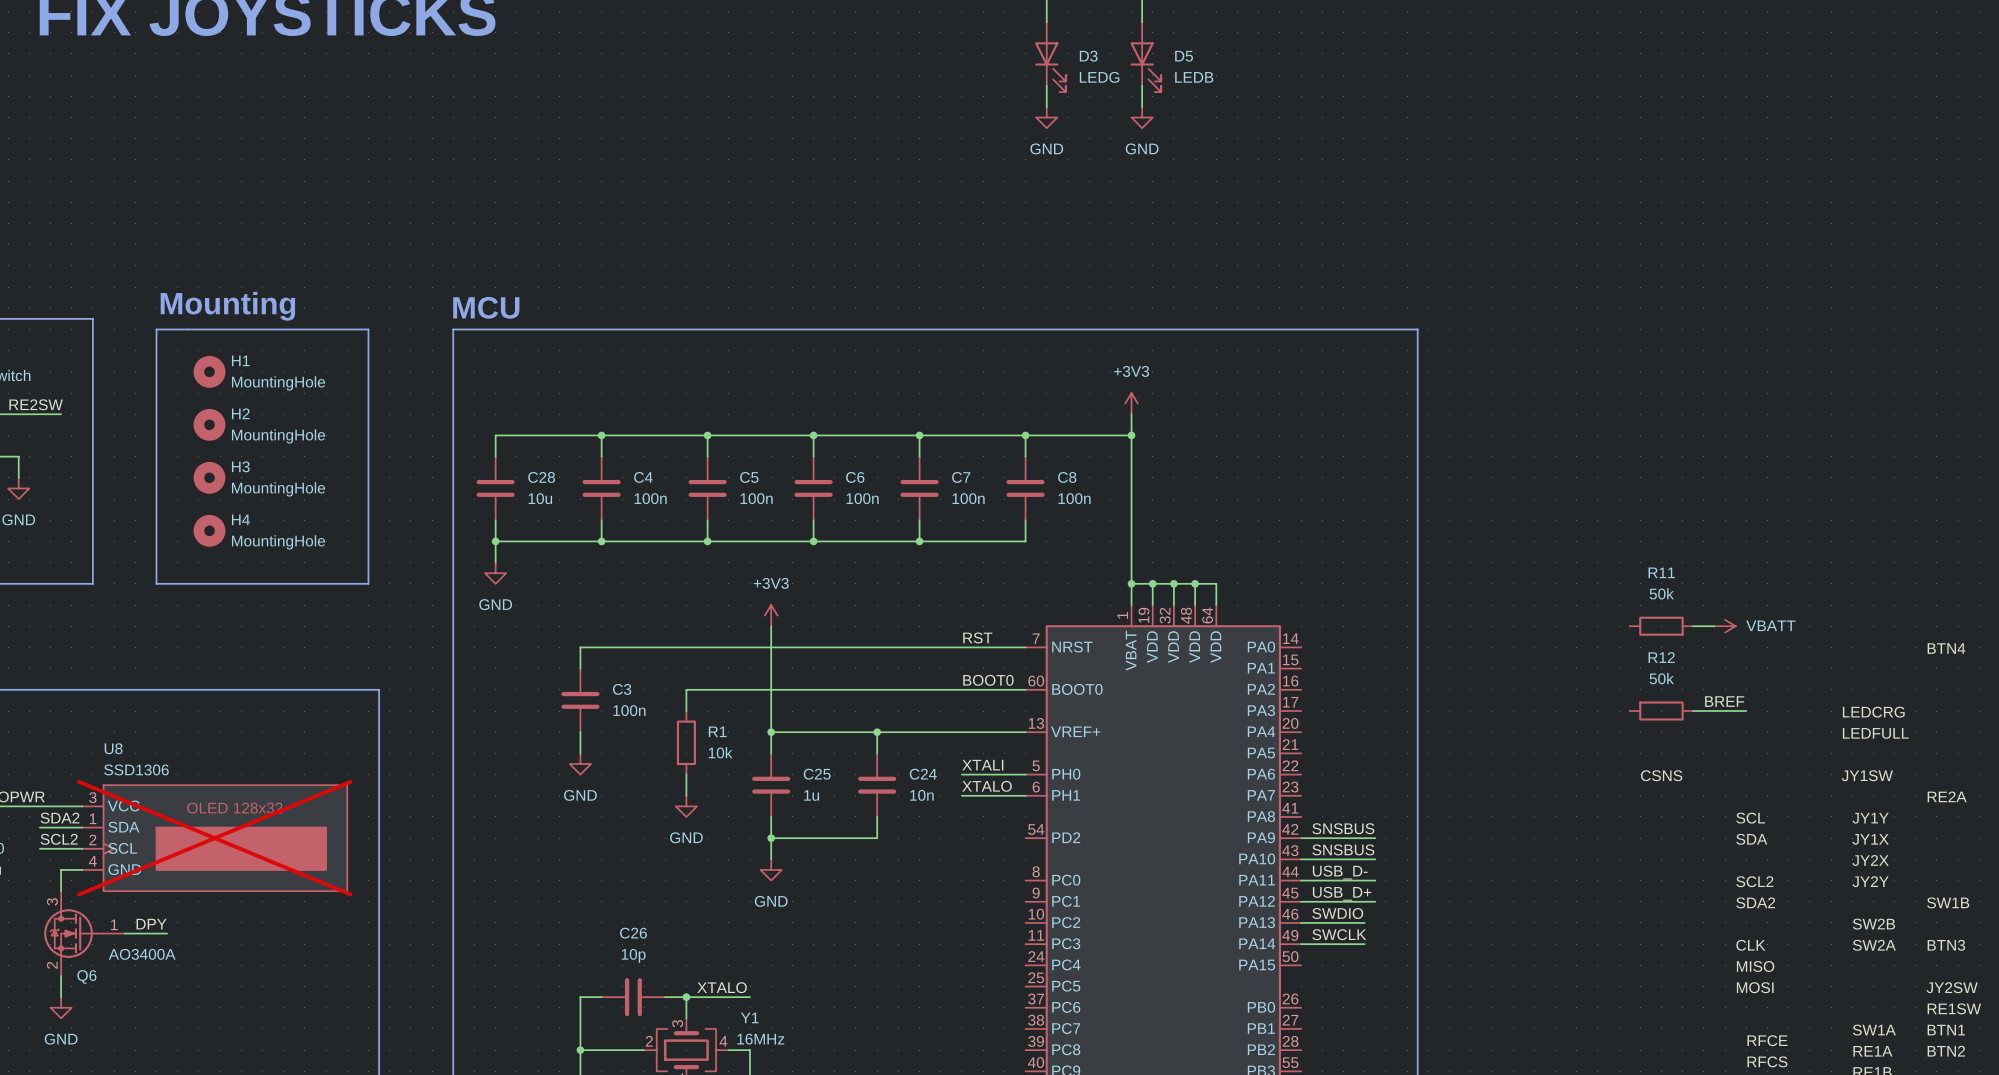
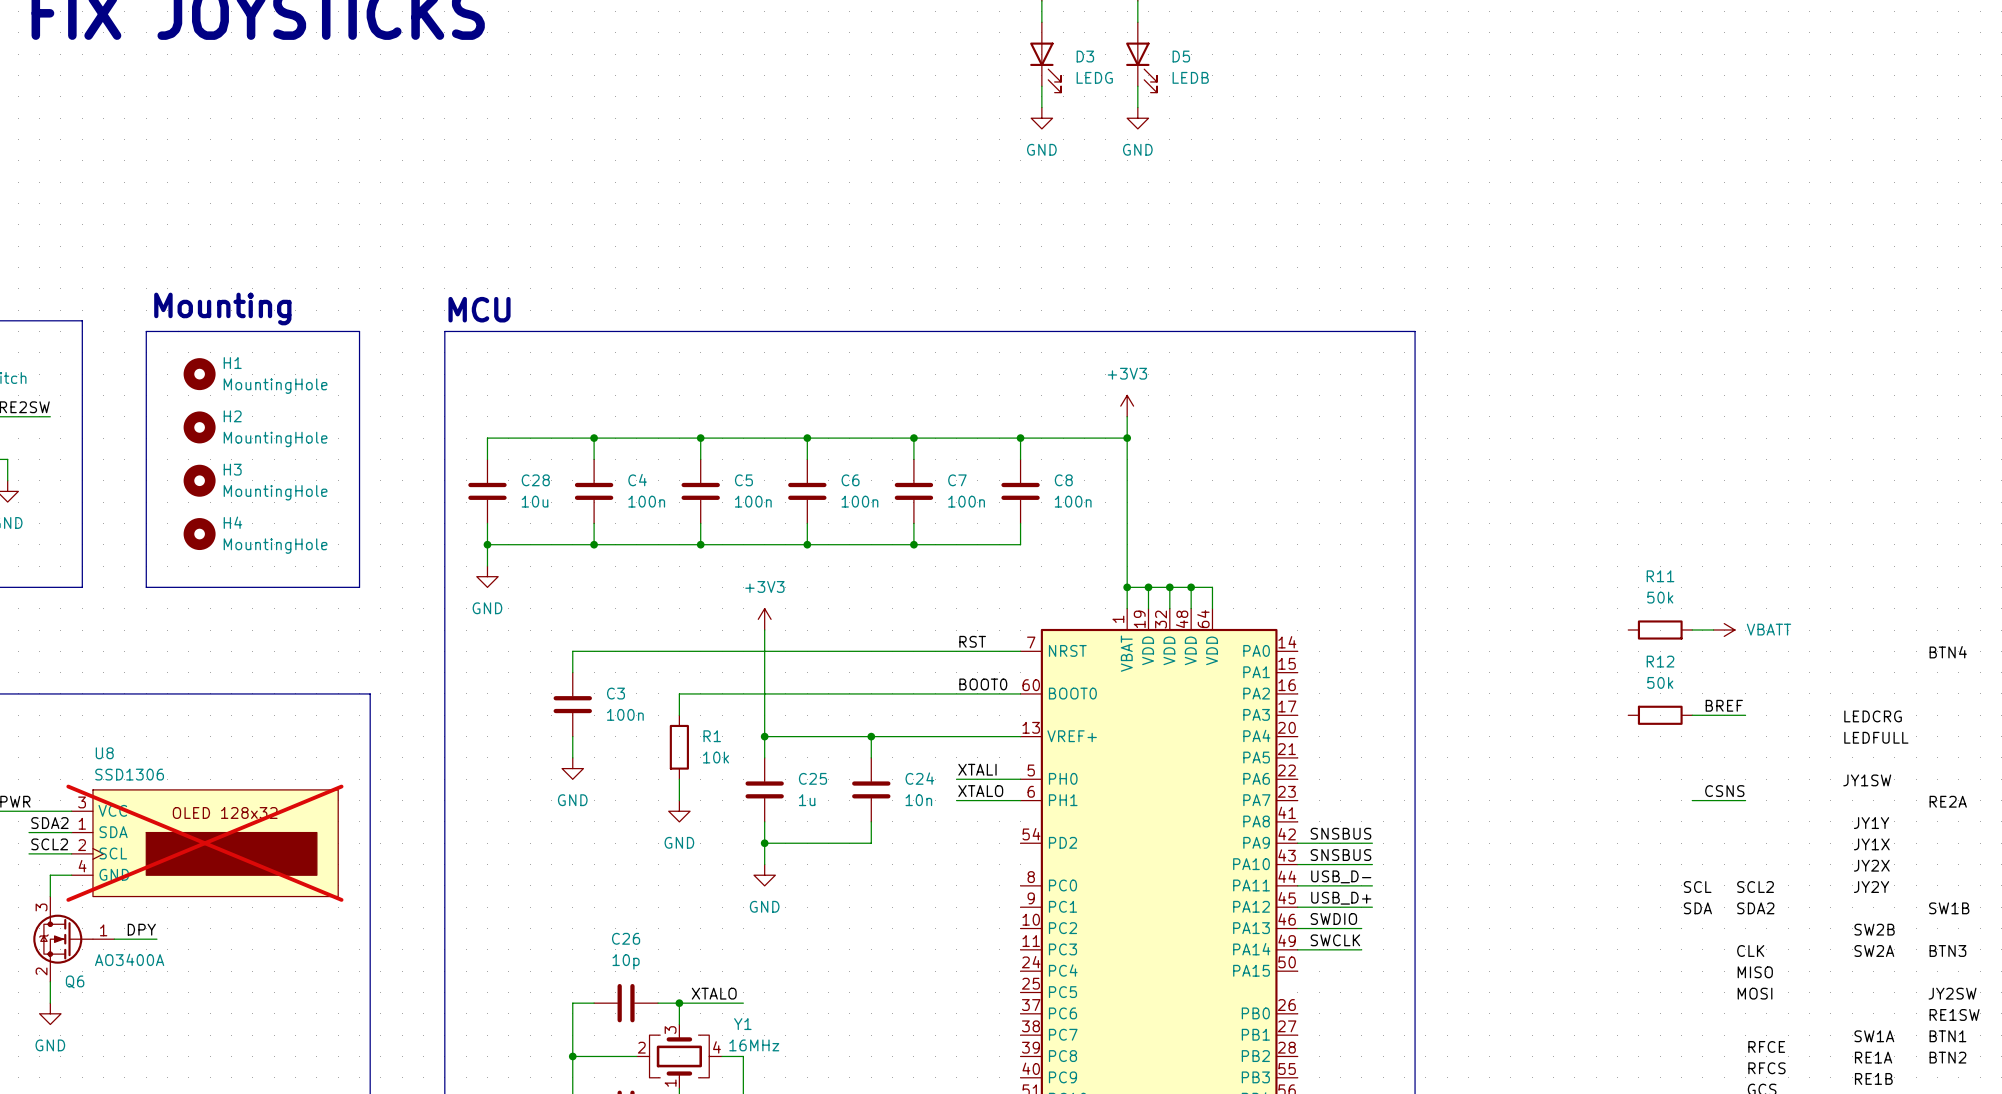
label position: CSNS (1661, 775) -> CSNS (1724, 791)
wire: none -> (1692, 800) (1745, 800)
label position: SCL (1750, 818) -> SCL (1697, 887)
label position: SDA (1751, 839) -> SDA (1697, 908)

